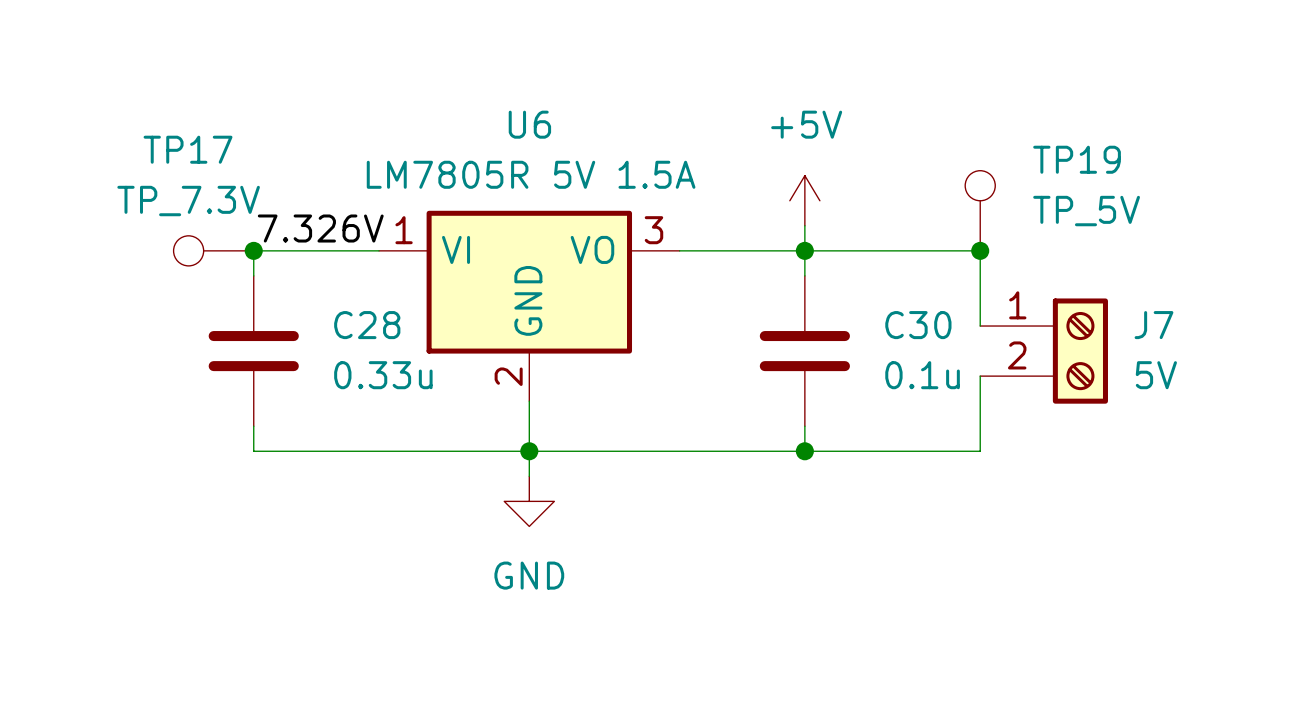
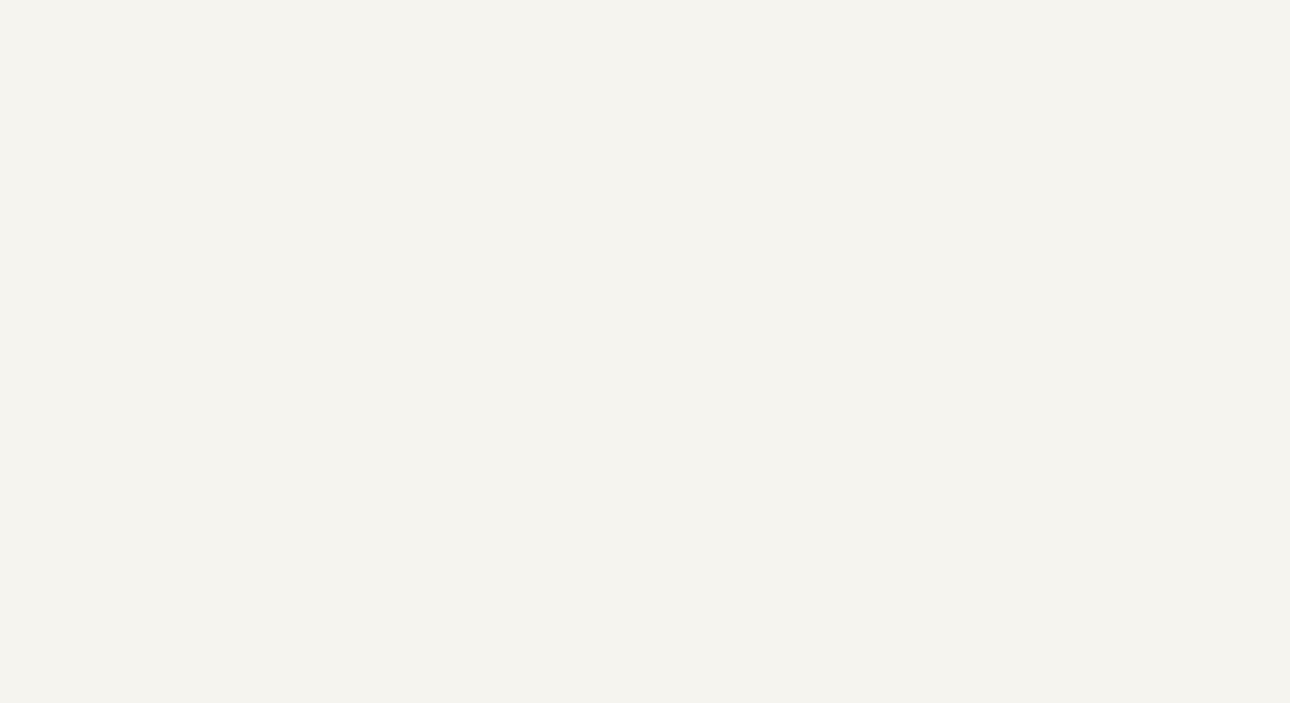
power symbol: +5V (804, 200) -> none
TP19: TP_5V (980, 210) -> none
wire: (804, 225) (804, 275) -> none
label: 7.326V (320, 228) -> none
TP17: TP_7.3V (213, 250) -> none
junction: (253, 250) -> none
wire: (379, 250) (253, 250) (253, 275) -> none
wire: (679, 250) (980, 250) (980, 326) -> none
junction: (804, 250) -> none
junction: (980, 250) -> none
U6: LM7805R 5V 1.5A (529, 305) -> none
C28: 0.33u (253, 351) -> none
C30: 0.1u (804, 351) -> none
J7: 5V (1044, 351) -> none
wire: (980, 376) (980, 451) (253, 451) (253, 426) -> none
wire: (529, 401) (529, 476) -> none
wire: (804, 426) (804, 451) -> none
junction: (529, 451) -> none
junction: (804, 451) -> none
power symbol: GND (529, 501) -> none

